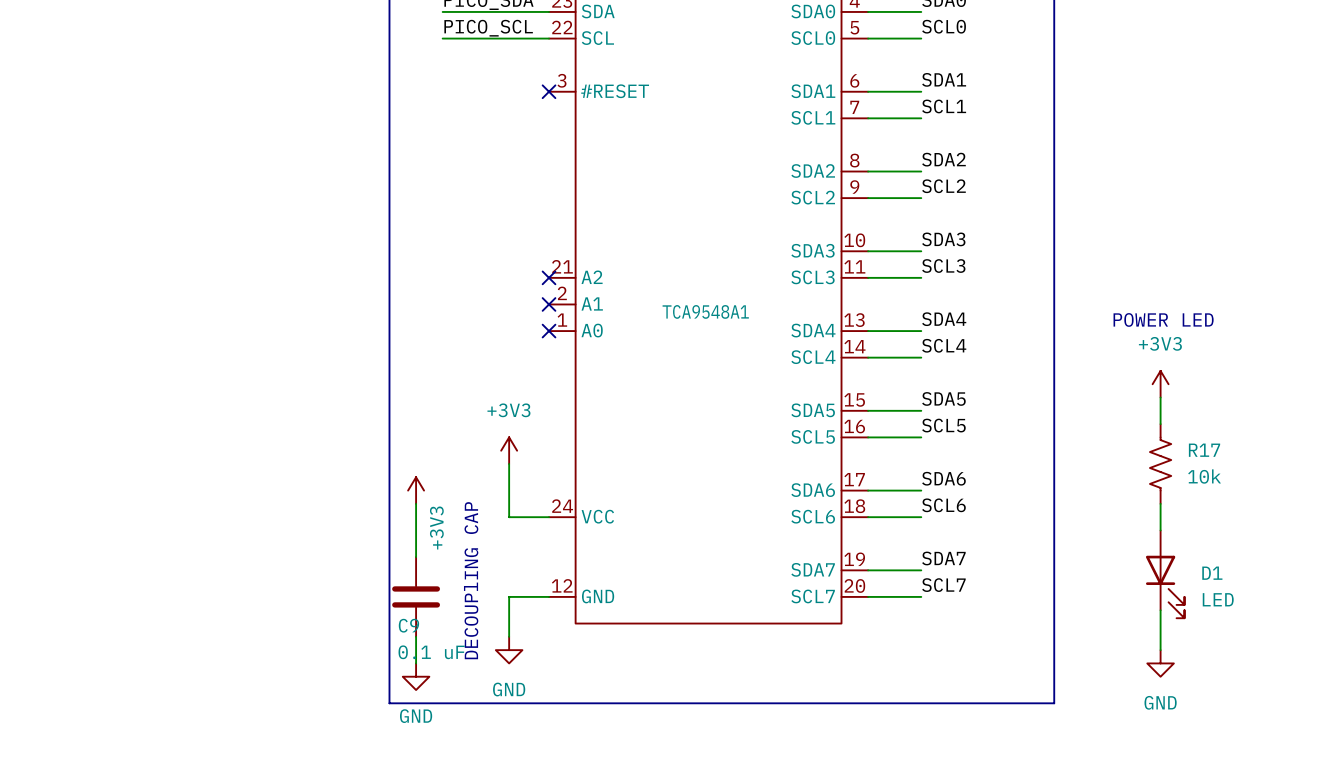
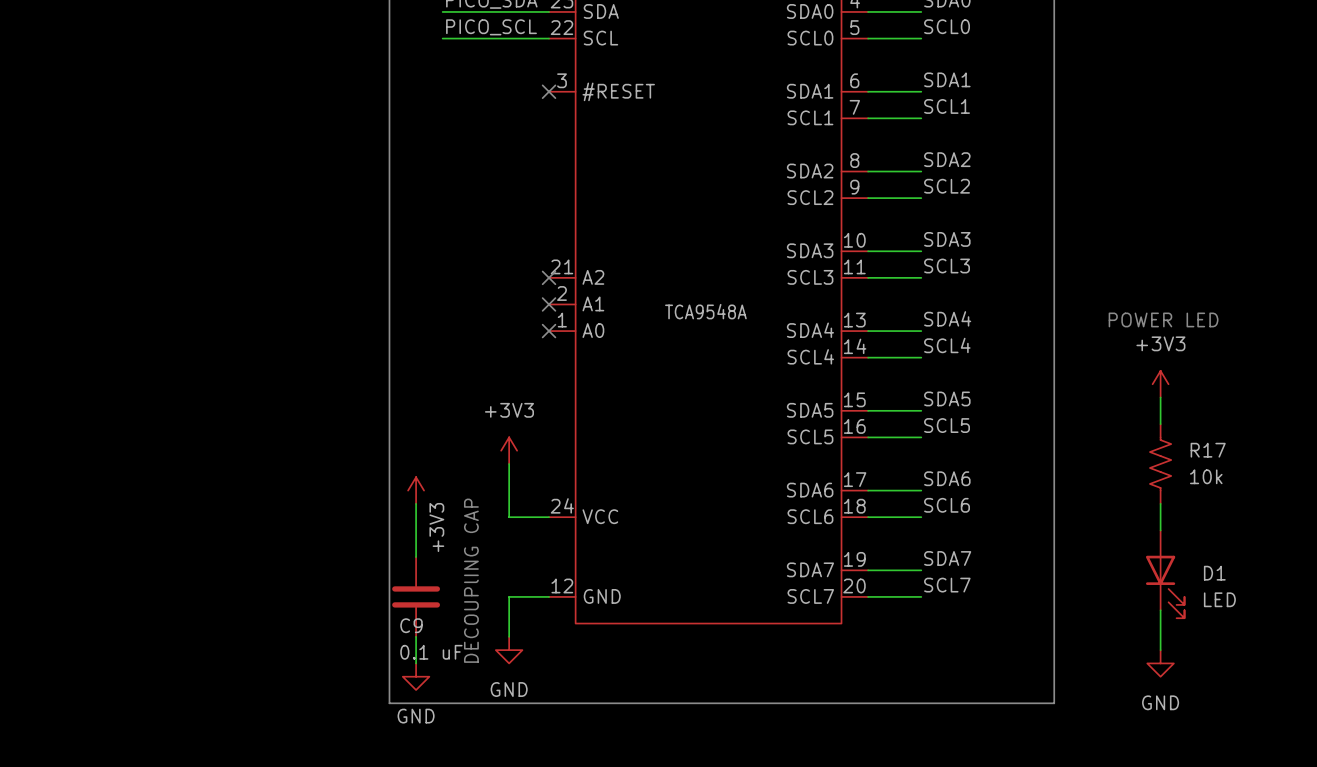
TCA9548A1 name: TCA9548A1 (705, 311) -> TCA9548A (705, 311)

